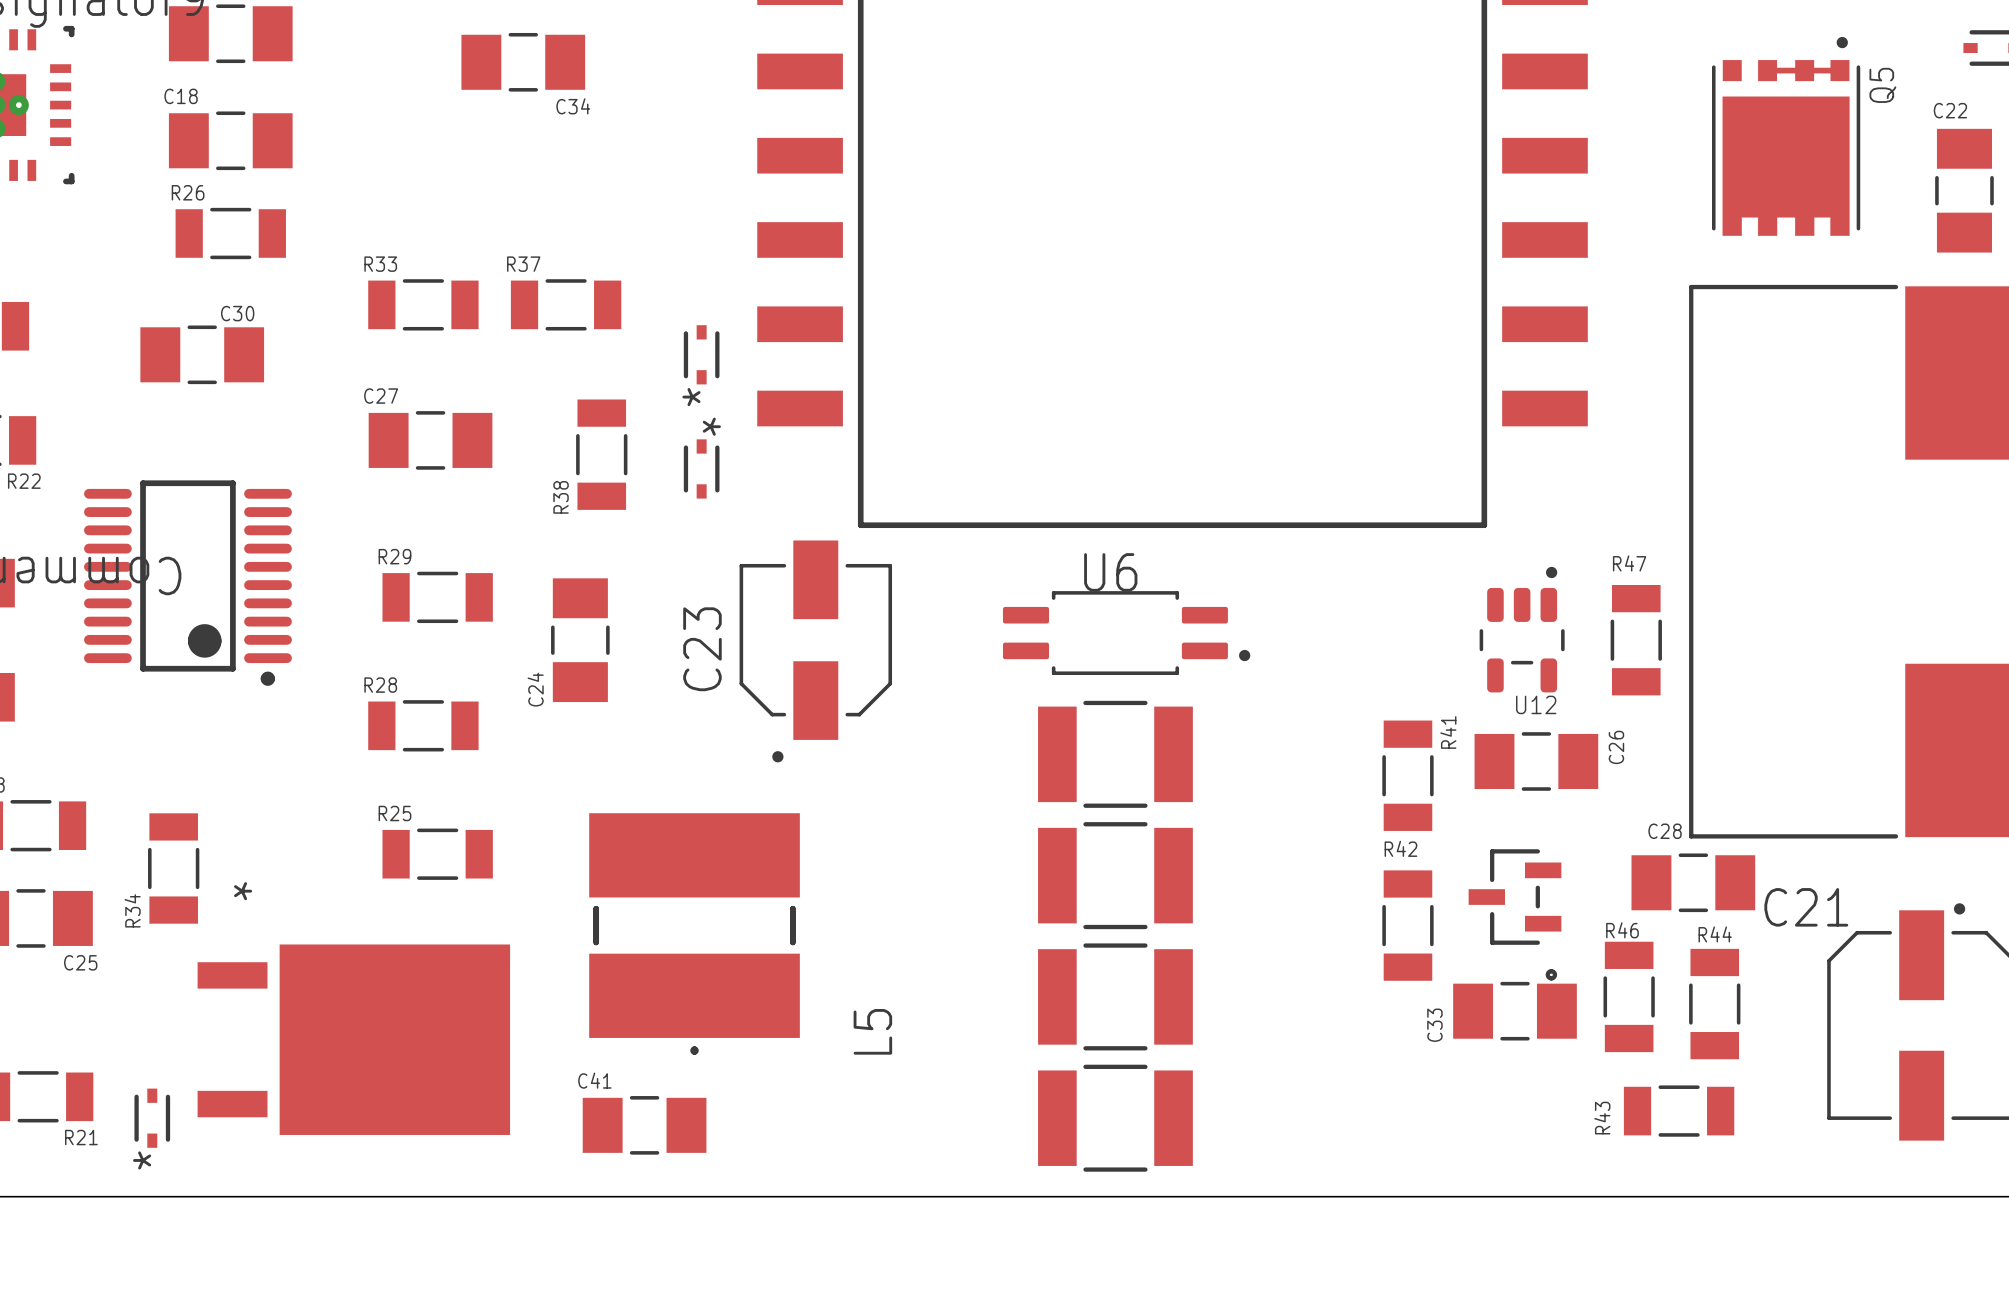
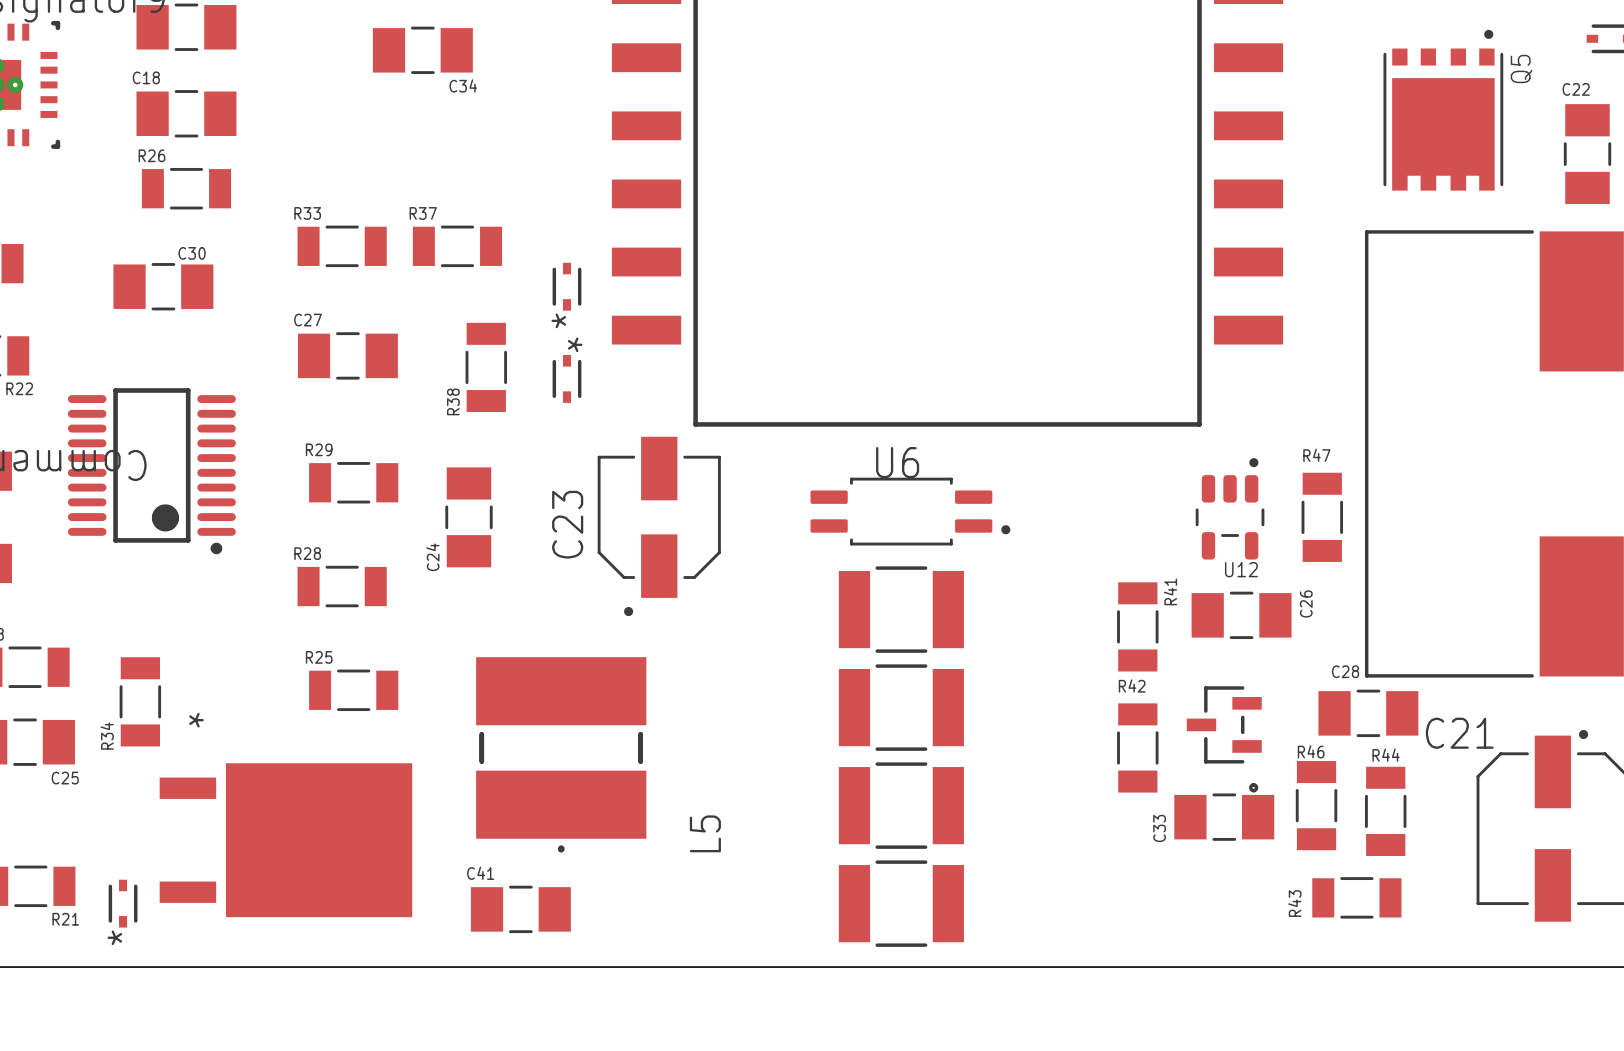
track: (1767, 70) (1839, 70) -> none

